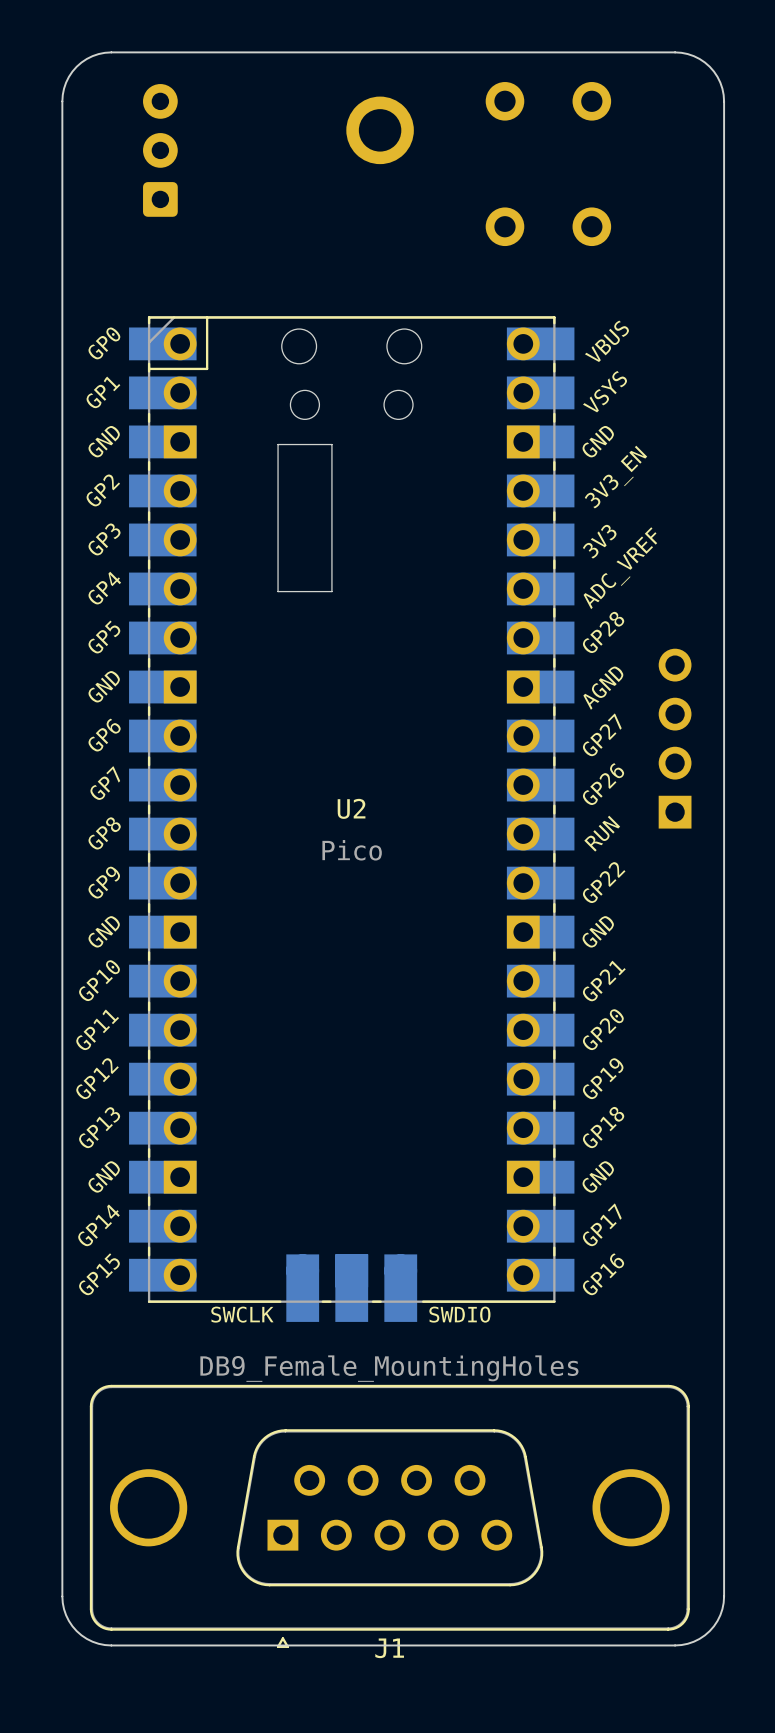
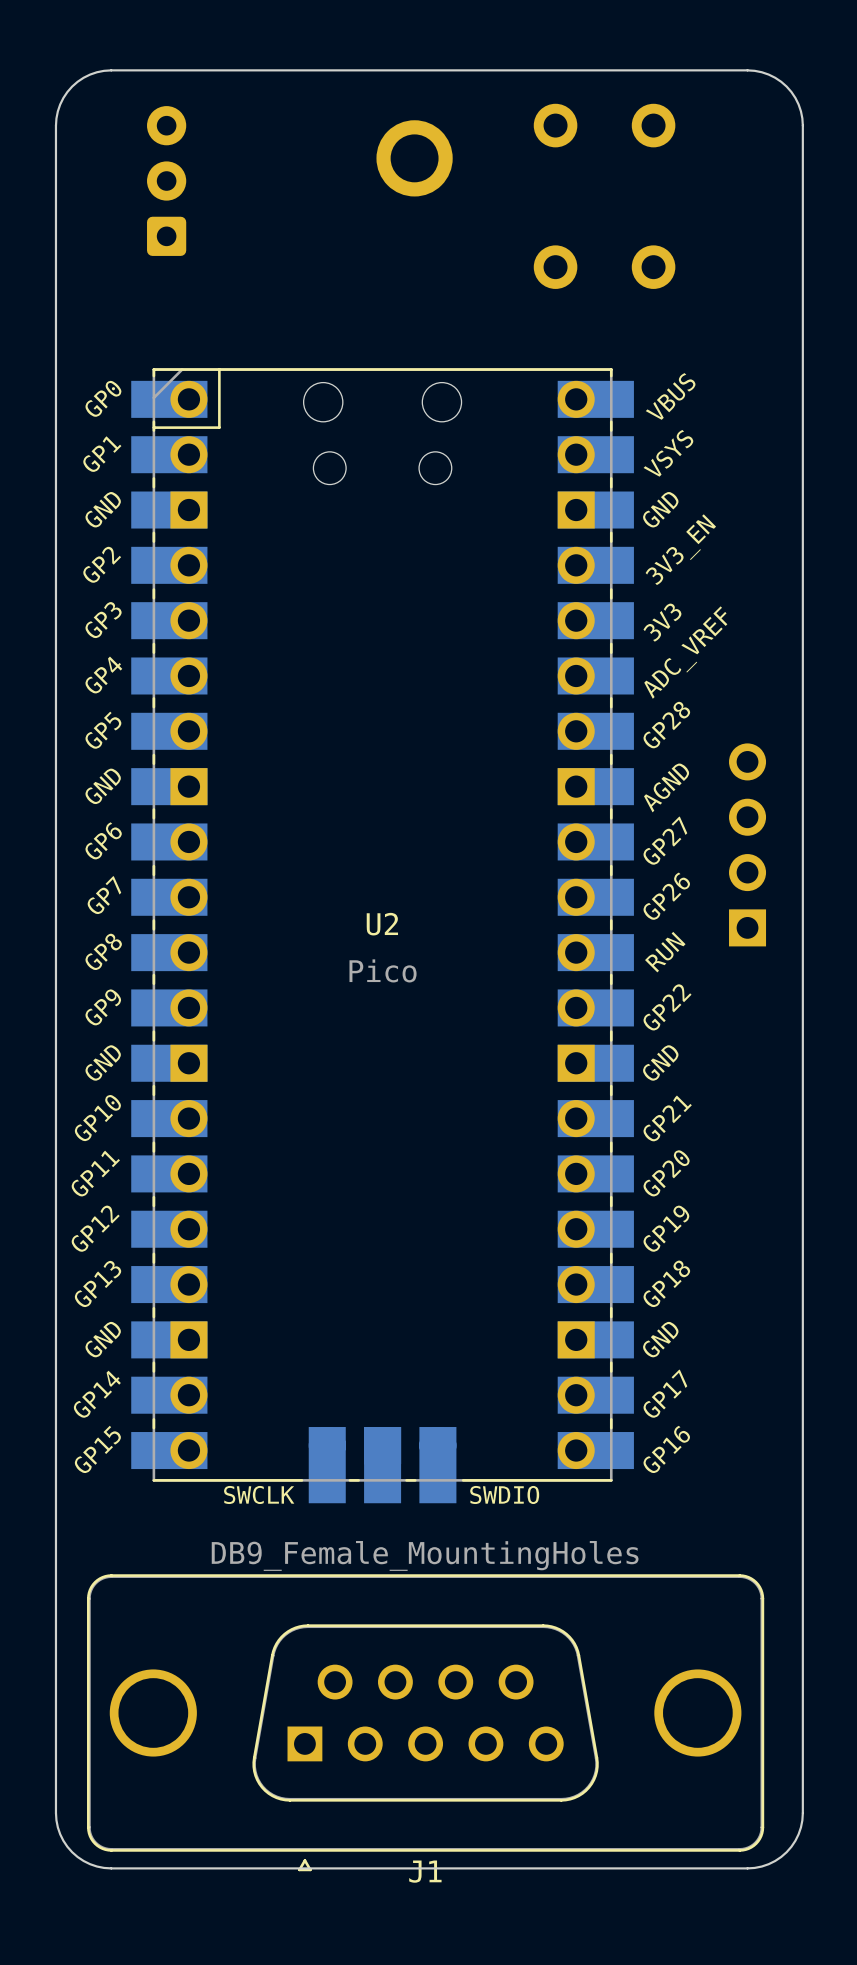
board edge: (331, 444) (331, 591) (278, 591) (278, 444) (331, 444) -> none

